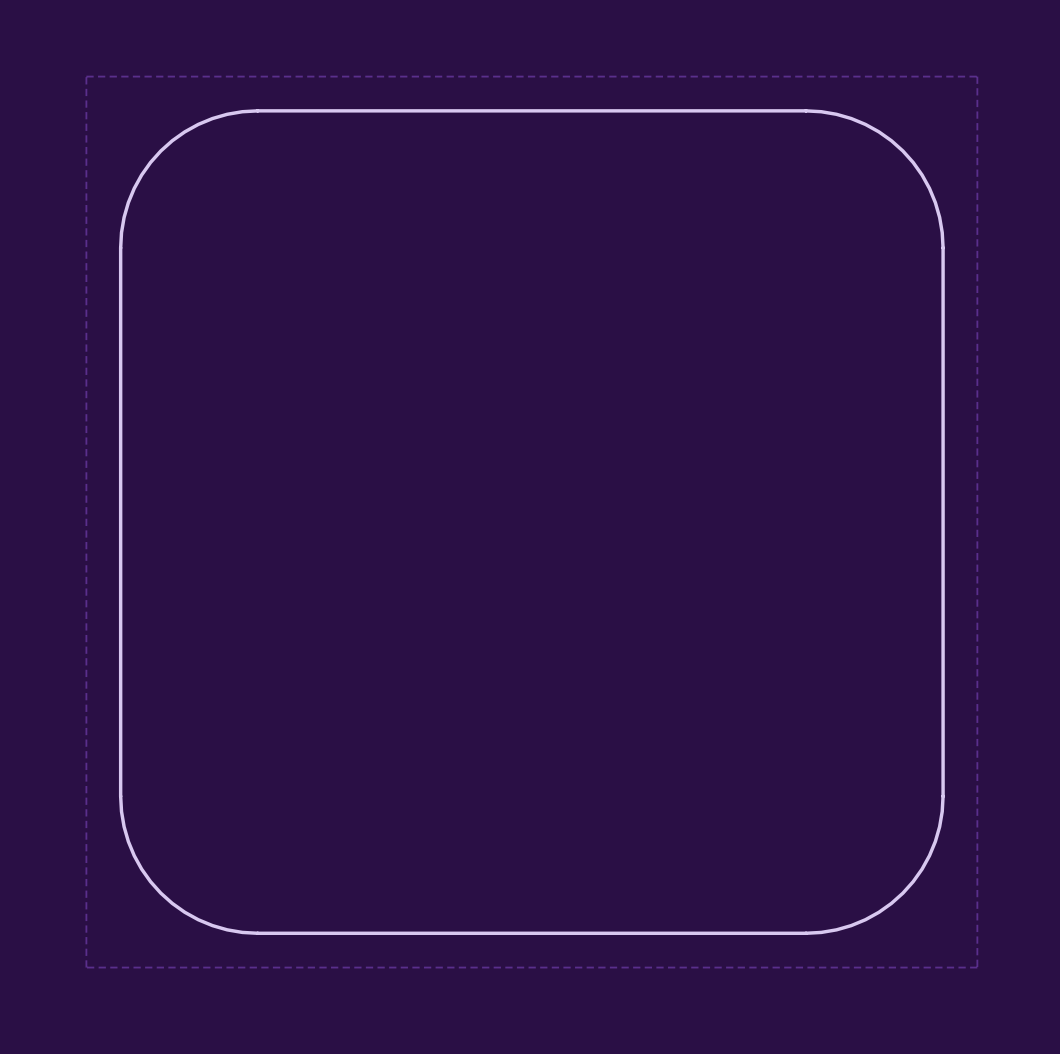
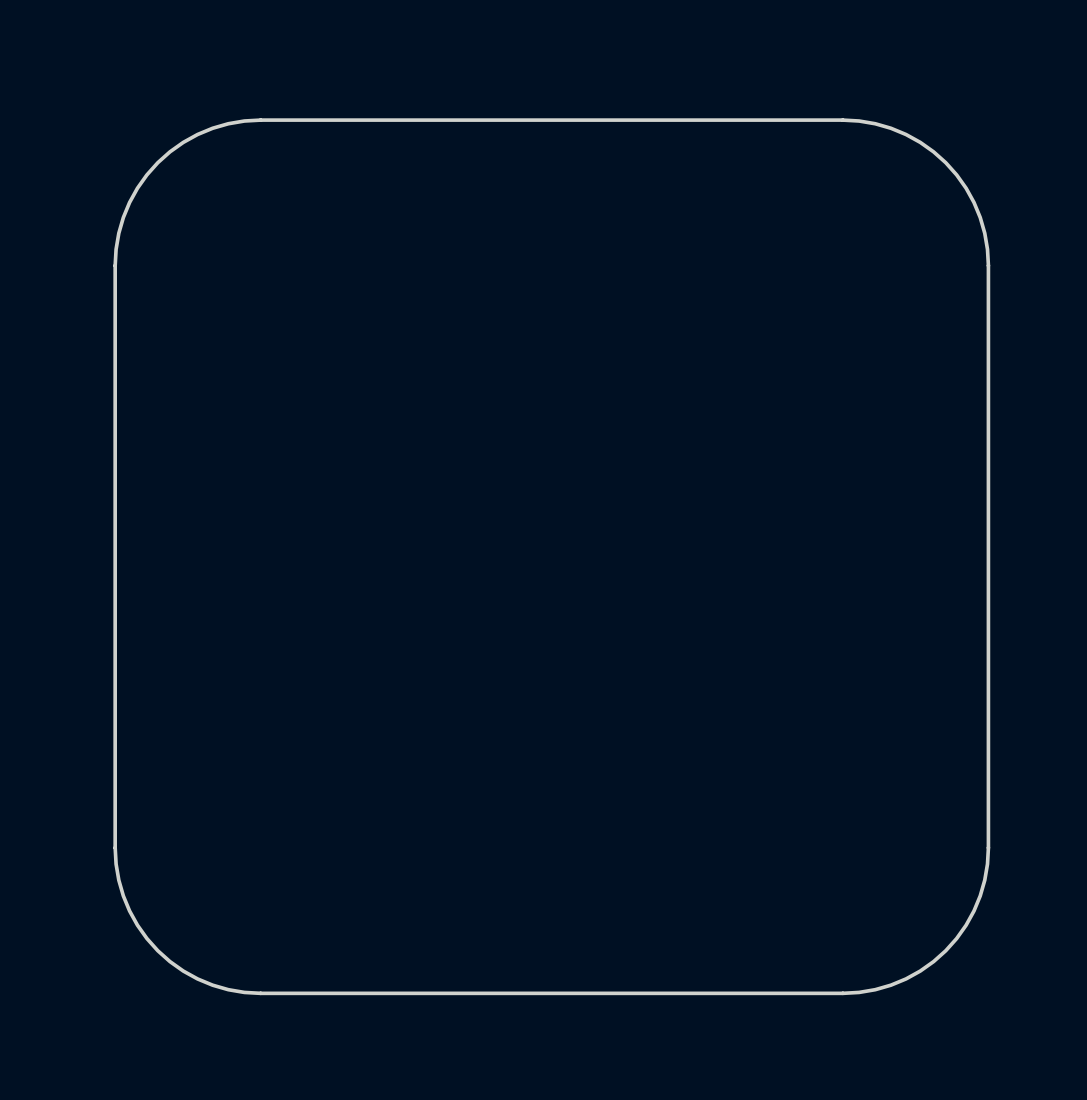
zone outline: (86, 76) (977, 76) (977, 967) (86, 967) (86, 76) -> none

